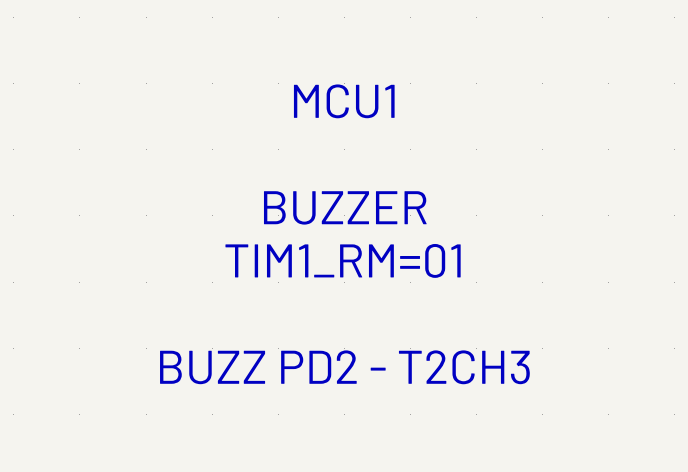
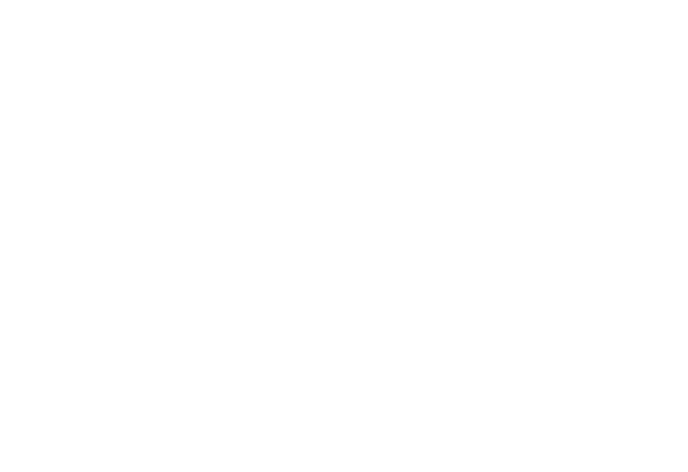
text: MCU1 (344, 101) -> none
text: BUZZER (345, 207) -> none
text: TIM1_RM=01 (343, 260) -> none
text: BUZZ PD2 - T2CH3 (344, 367) -> none

